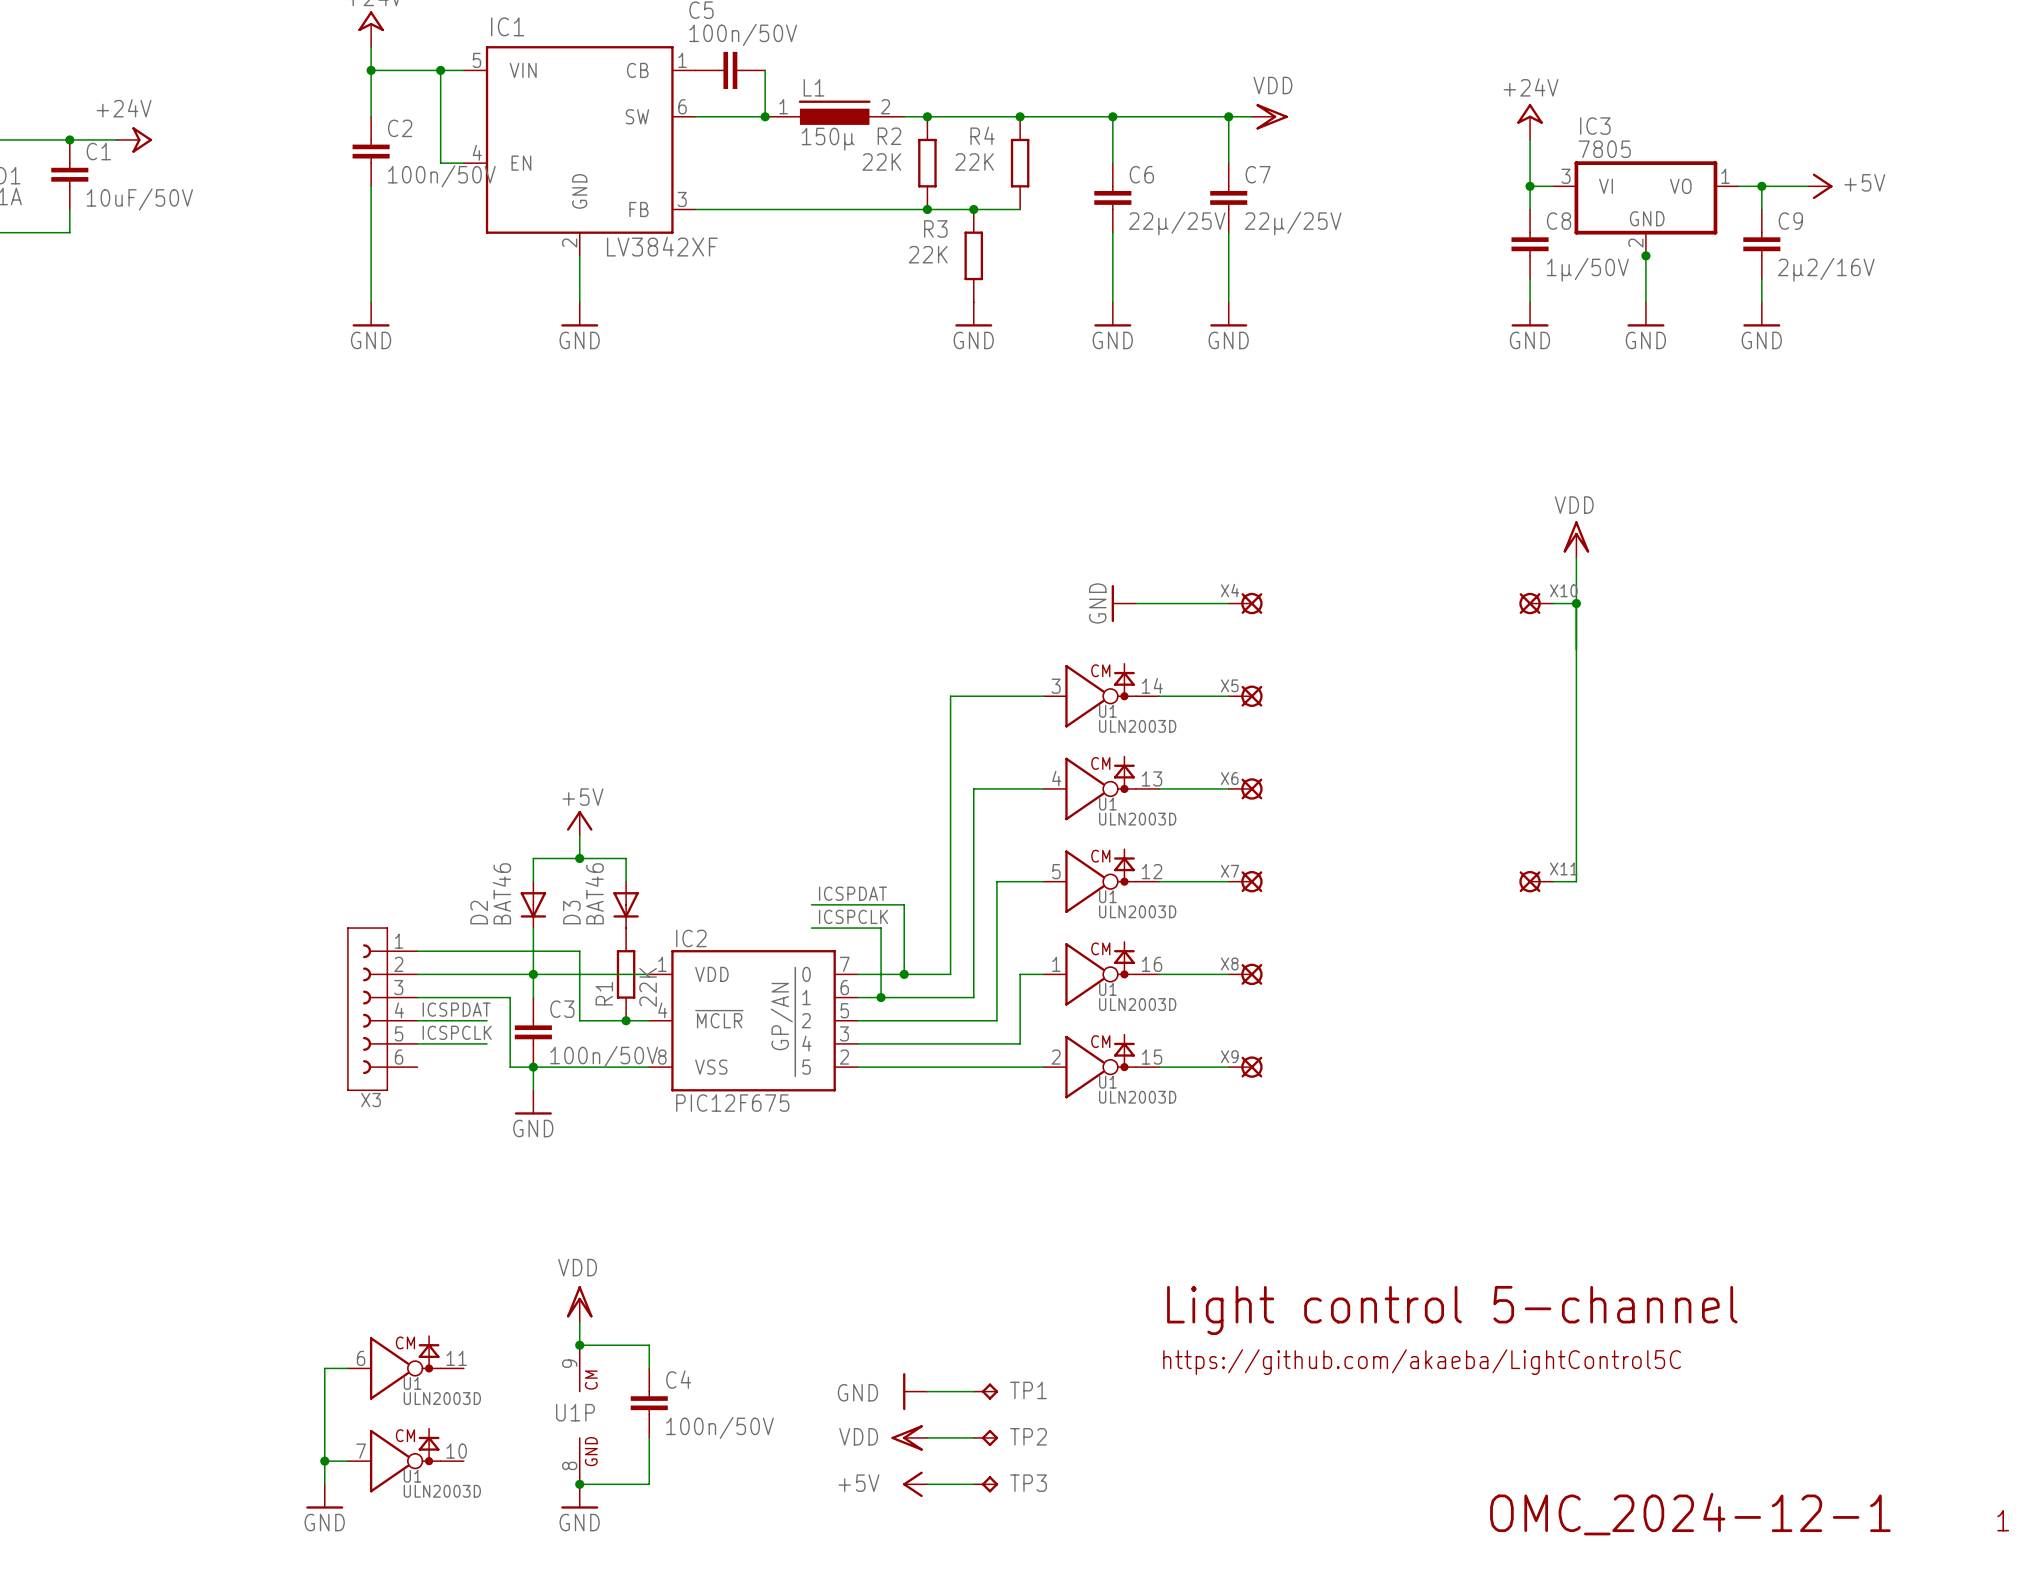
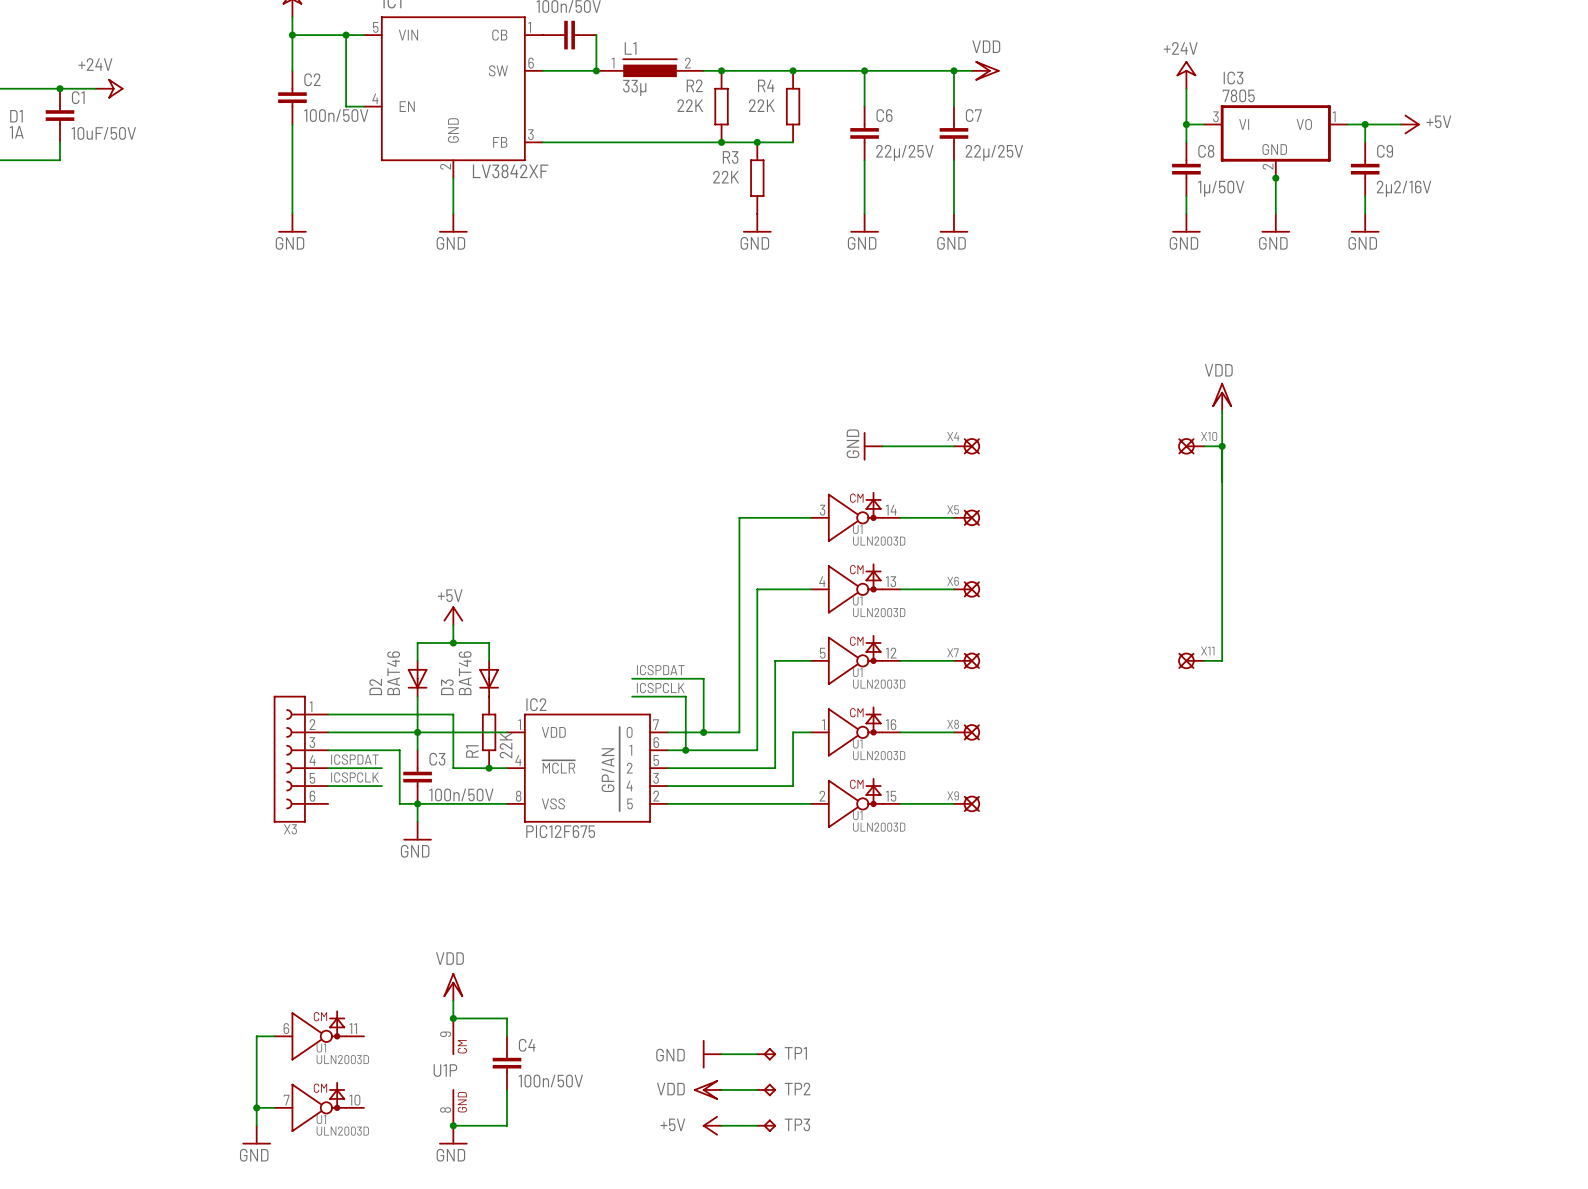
L1 value: 150µ (828, 139) -> 33µ (634, 87)
text: Light control 5-channel (1452, 1310) -> none
text: https://github.com/akaeba/LightControl5C (1422, 1362) -> none
text: OMC_2024-12-1 (1690, 1514) -> none
text: 1 (2003, 1520) -> none

